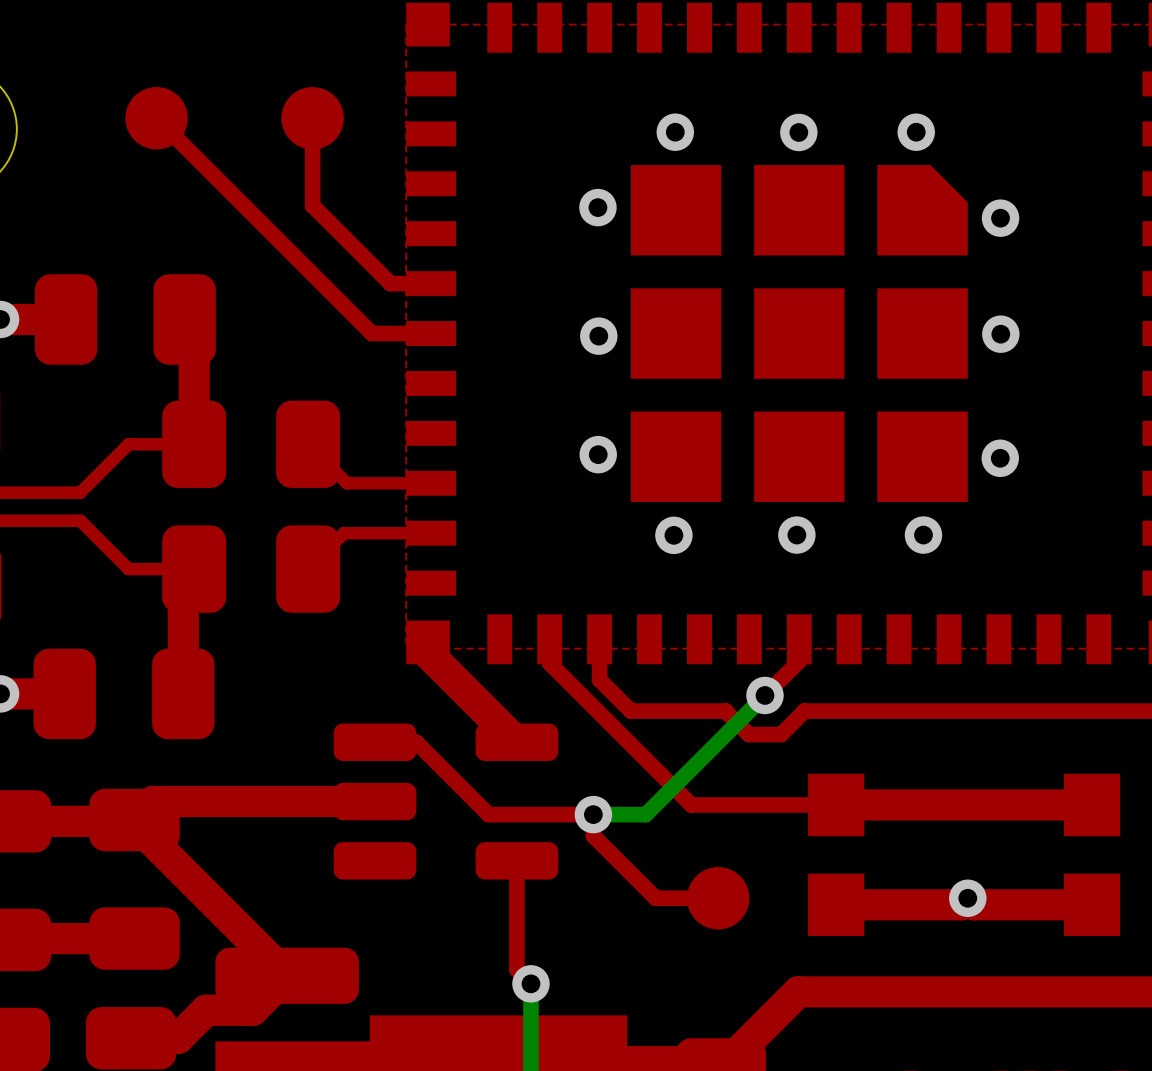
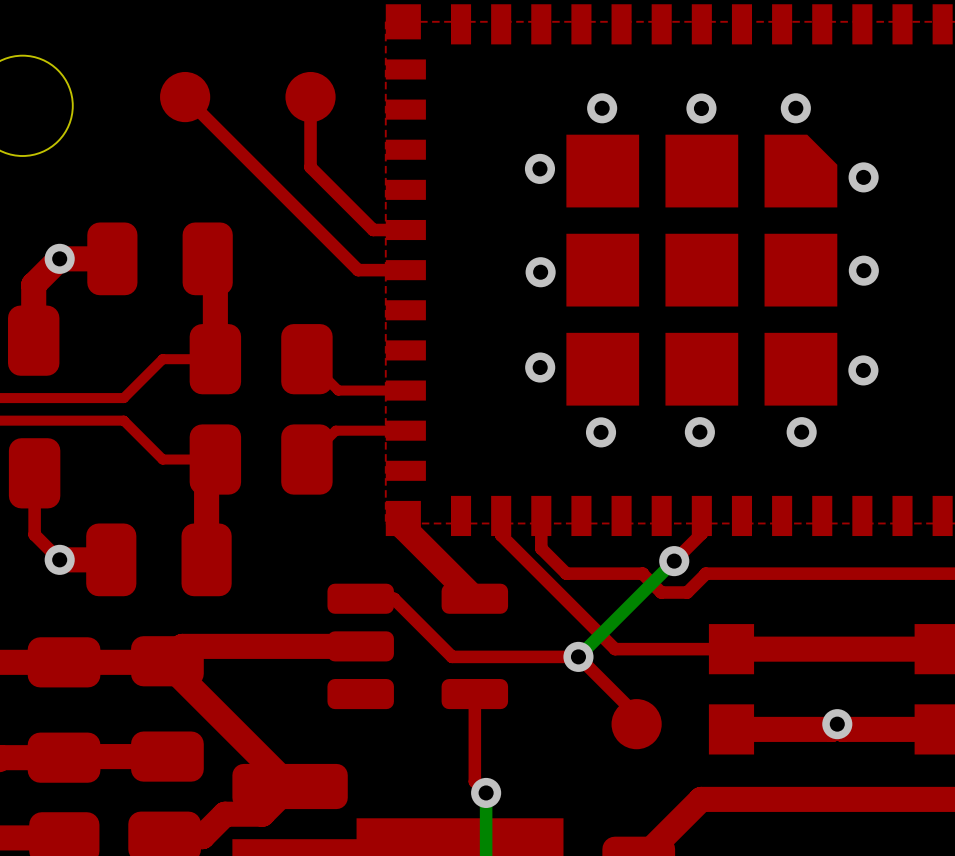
top track: (593, 814) (593, 835) (655, 898) (718, 898) -> (536, 656) (578, 656) (636, 715) (636, 724)
via position: (593, 814) -> (578, 656)
bottom track: (645, 814) (593, 814) -> none

